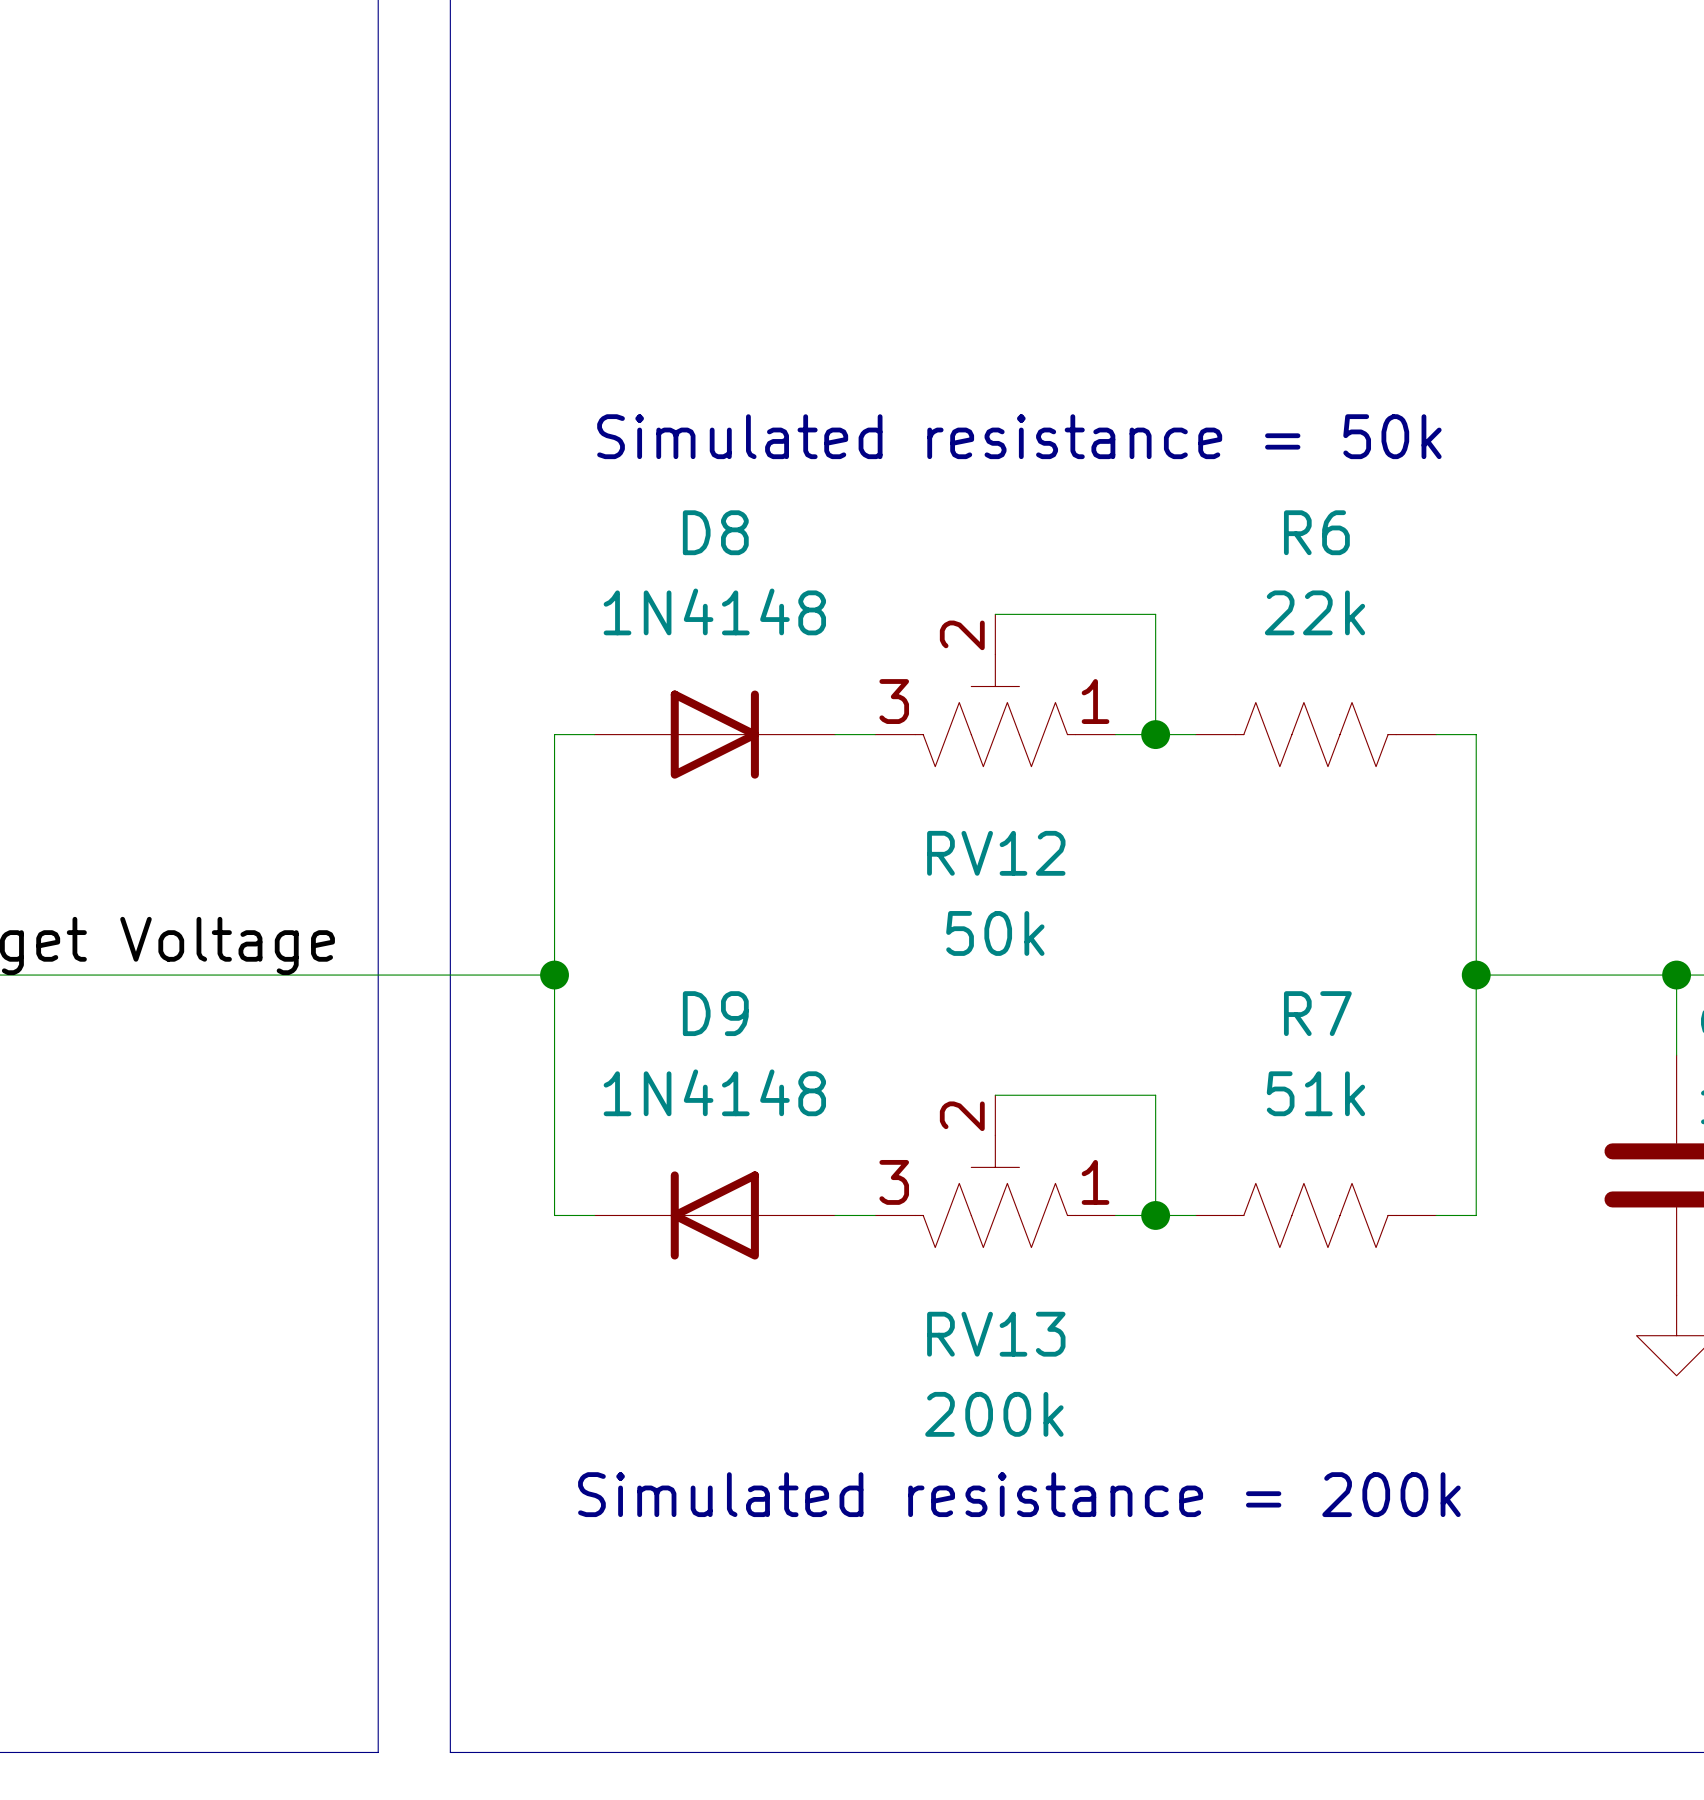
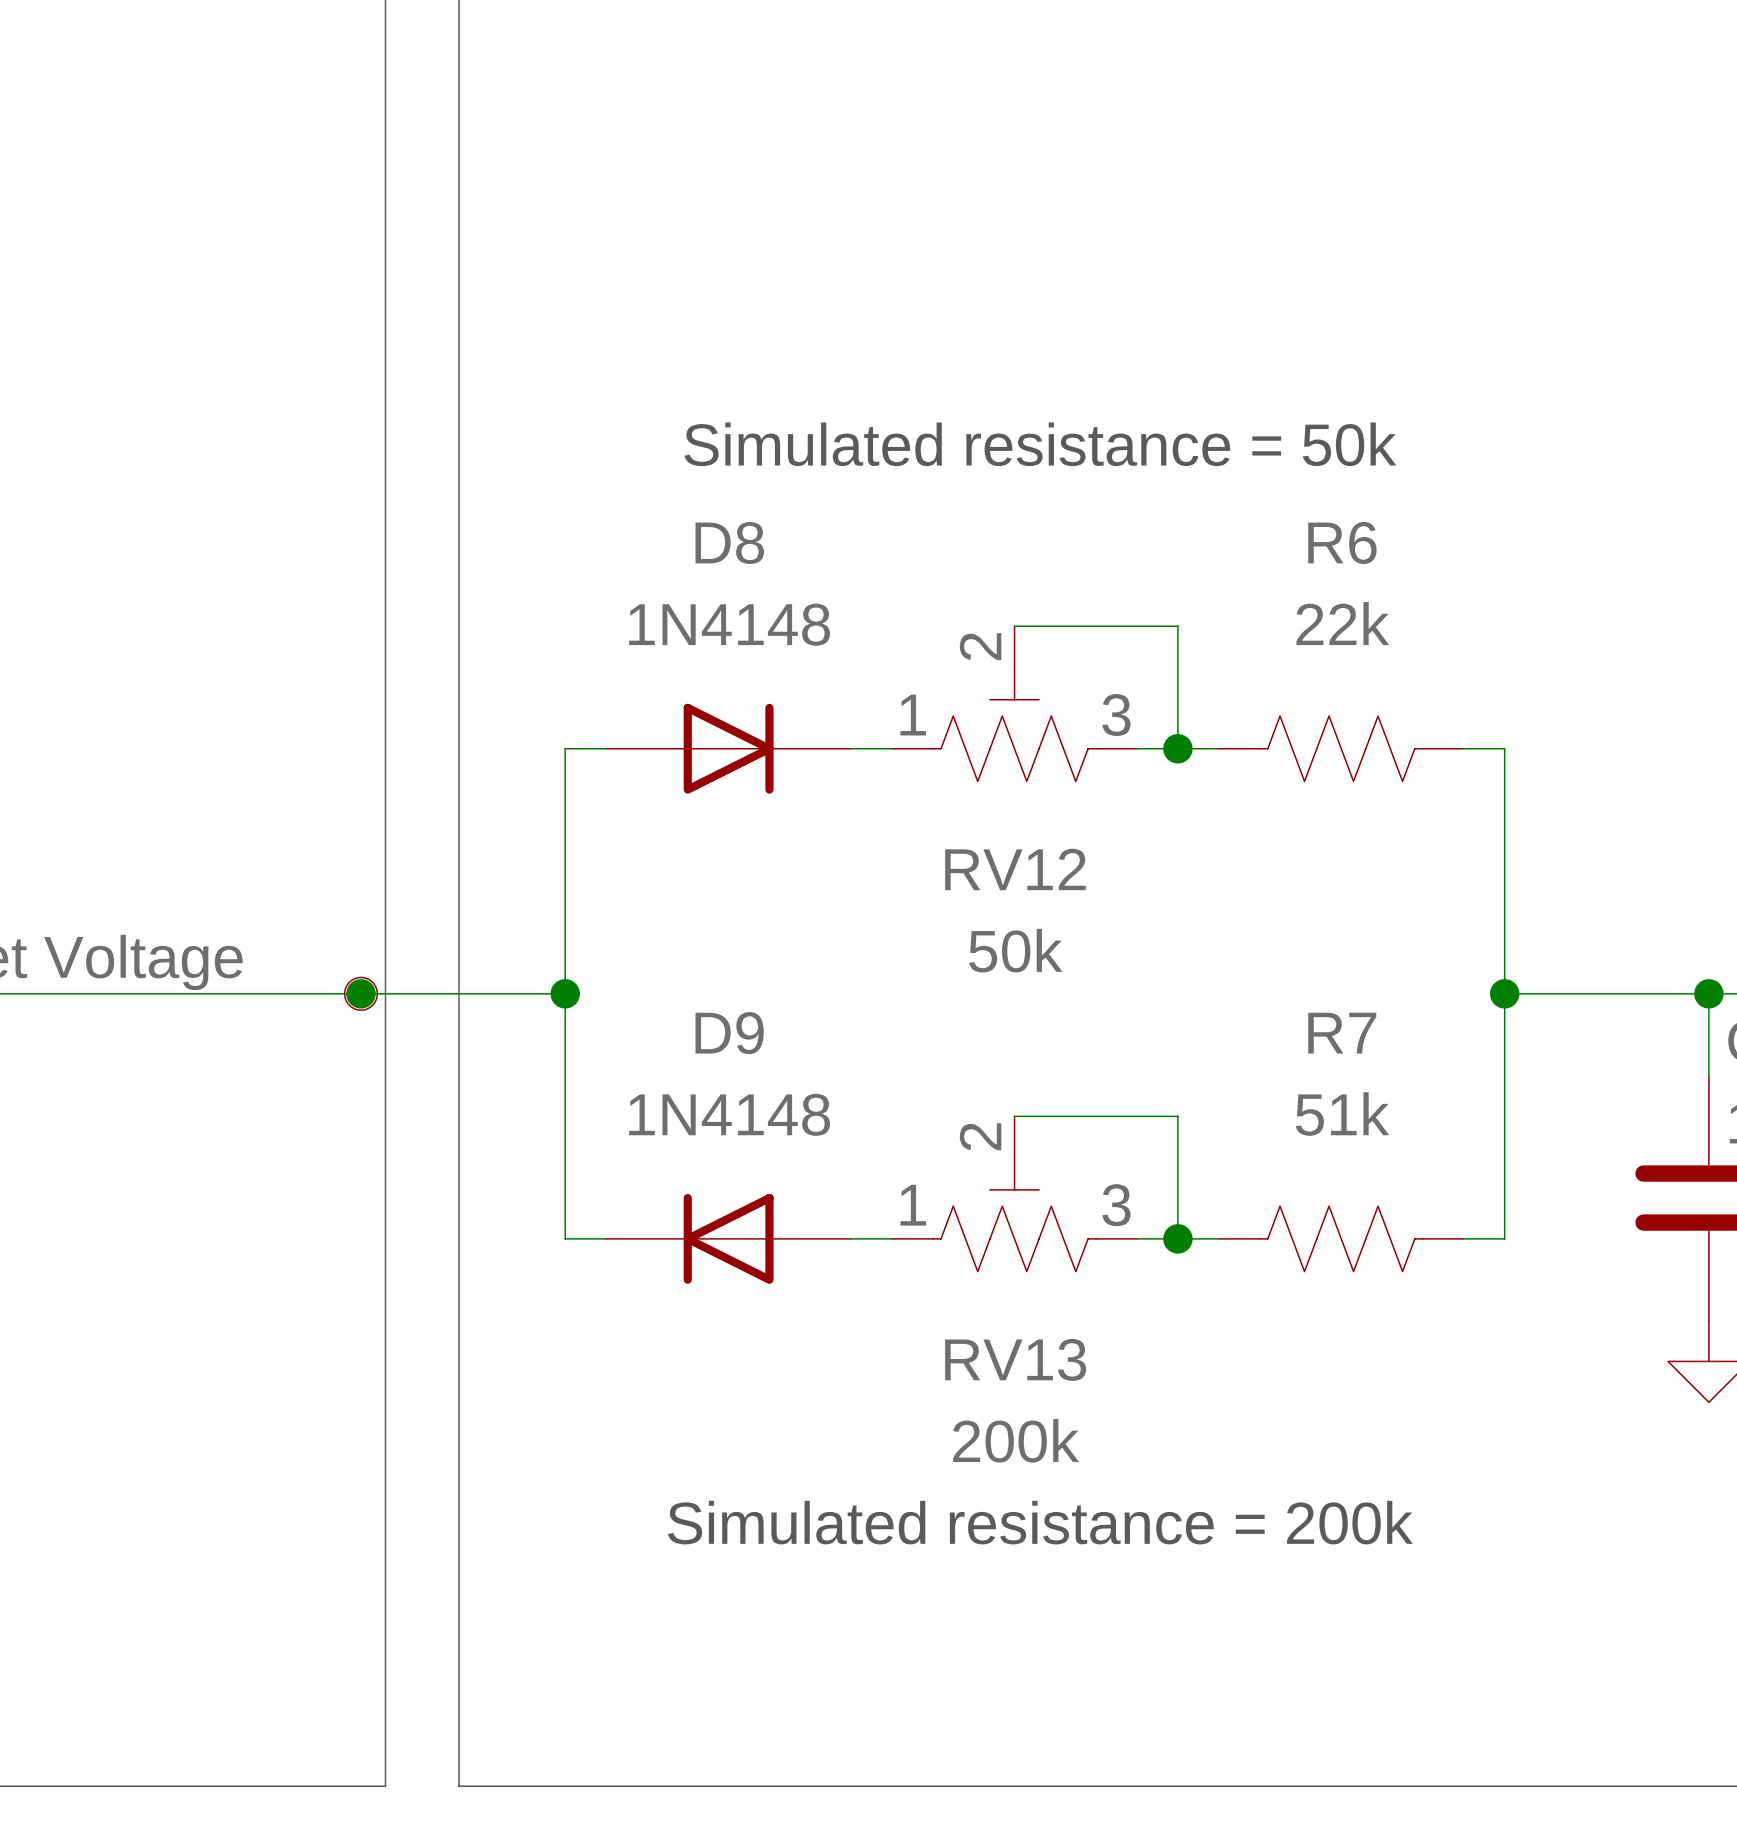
RV12 flip: as is (995, 710) -> left-right (1014, 724)
part: none -> (360, 993)
junction: none -> (360, 993)
RV13 flip: as is (995, 1191) -> left-right (1014, 1214)

